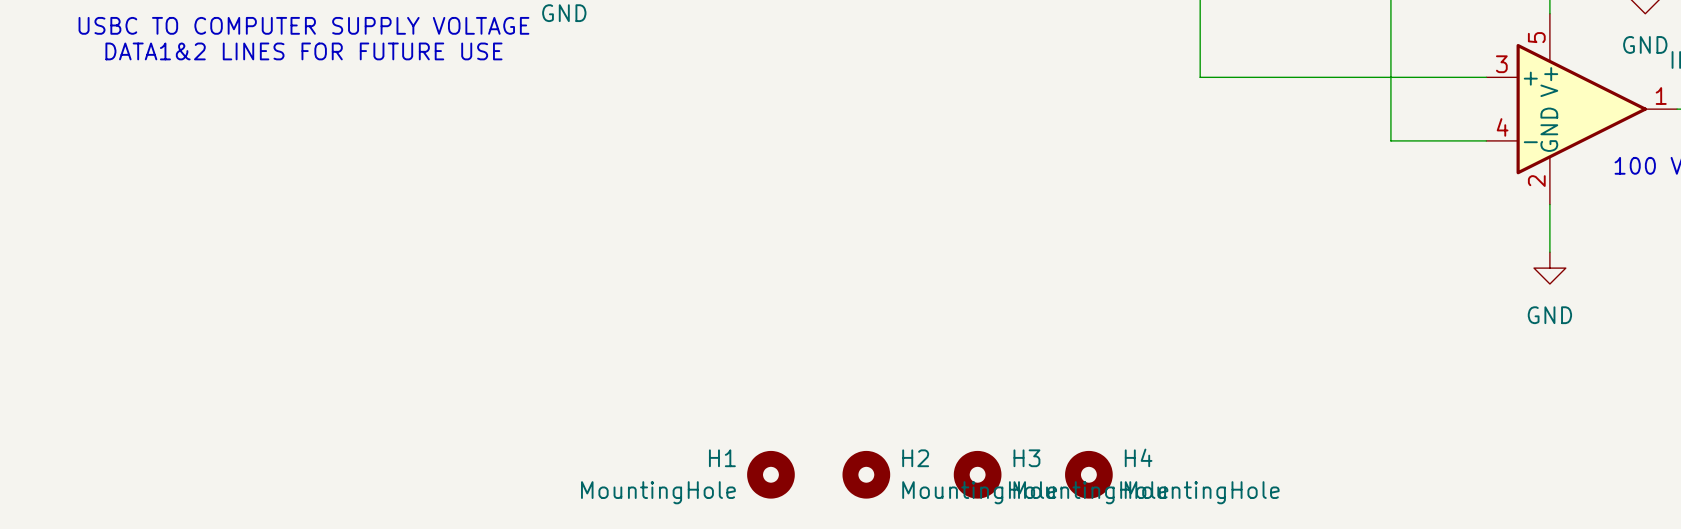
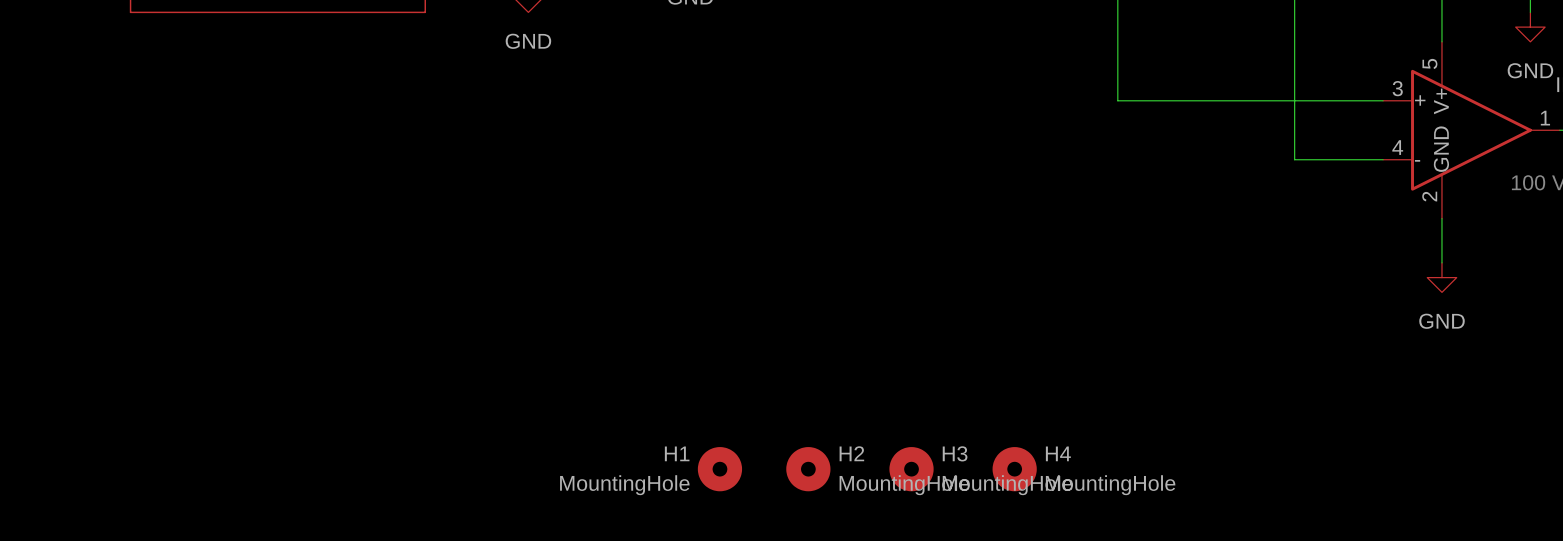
text: USBC TO COMPUTER SUPPLY VOLTAGE (303, 25) -> none
text: DATA1&2 LINES FOR FUTURE USE (303, 51) -> none

